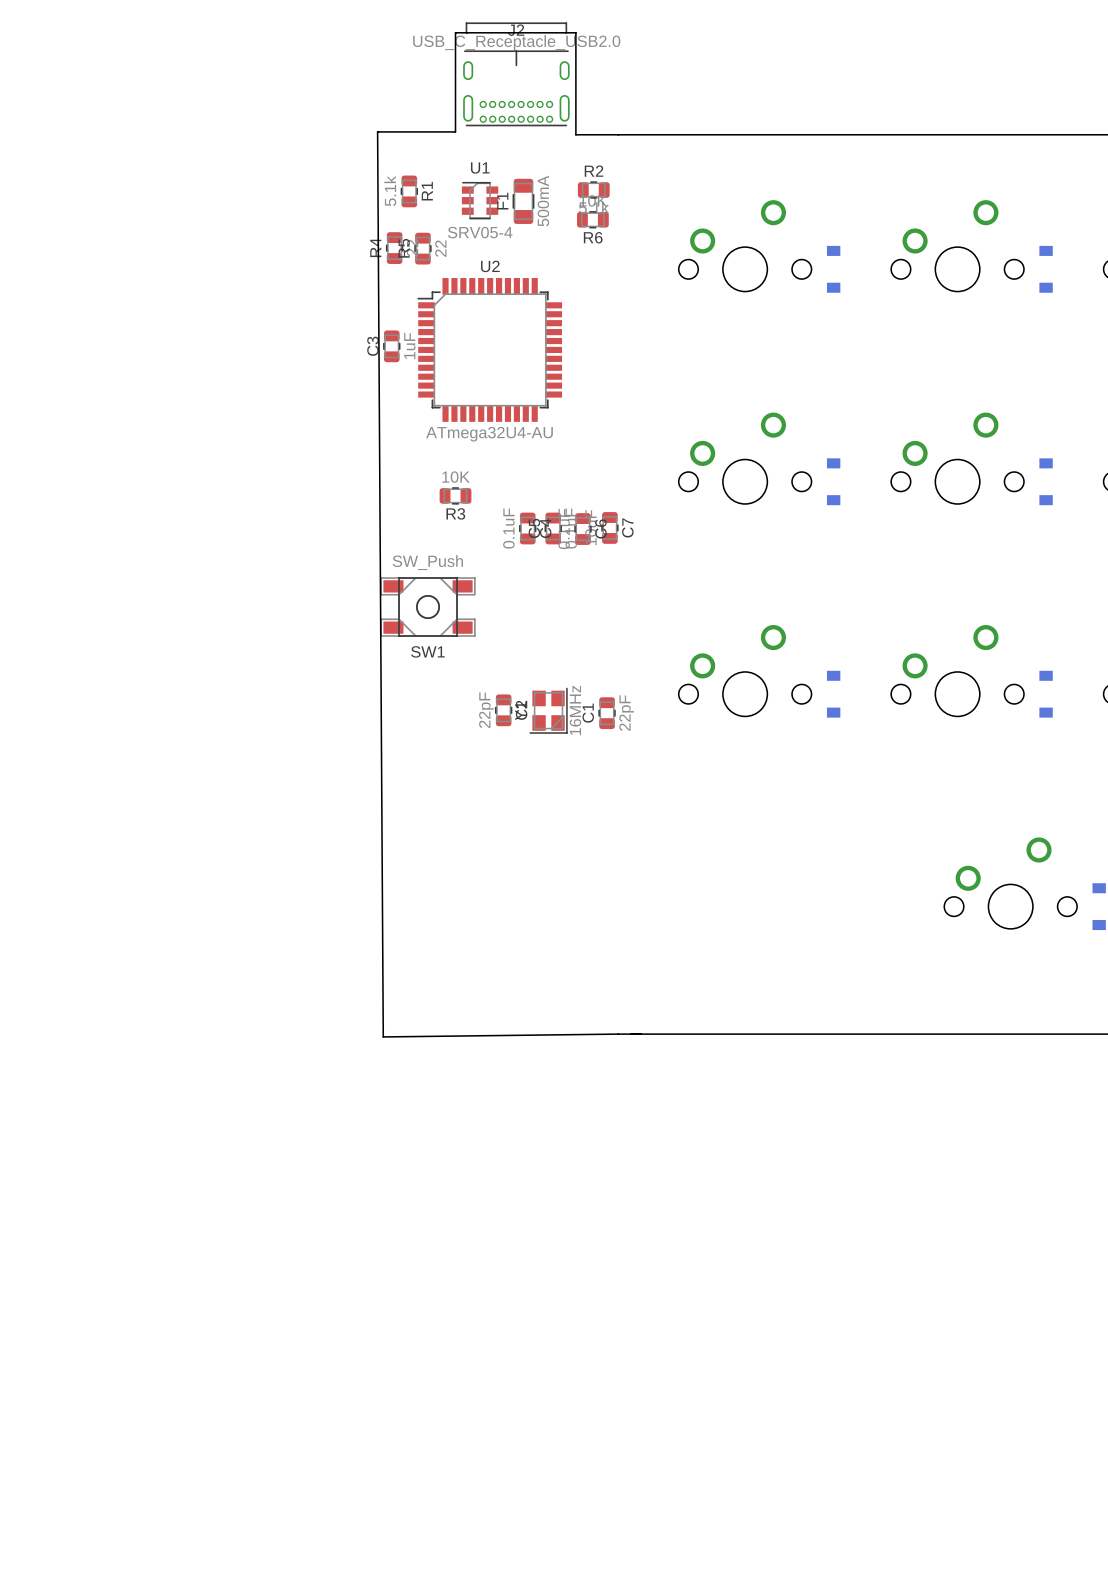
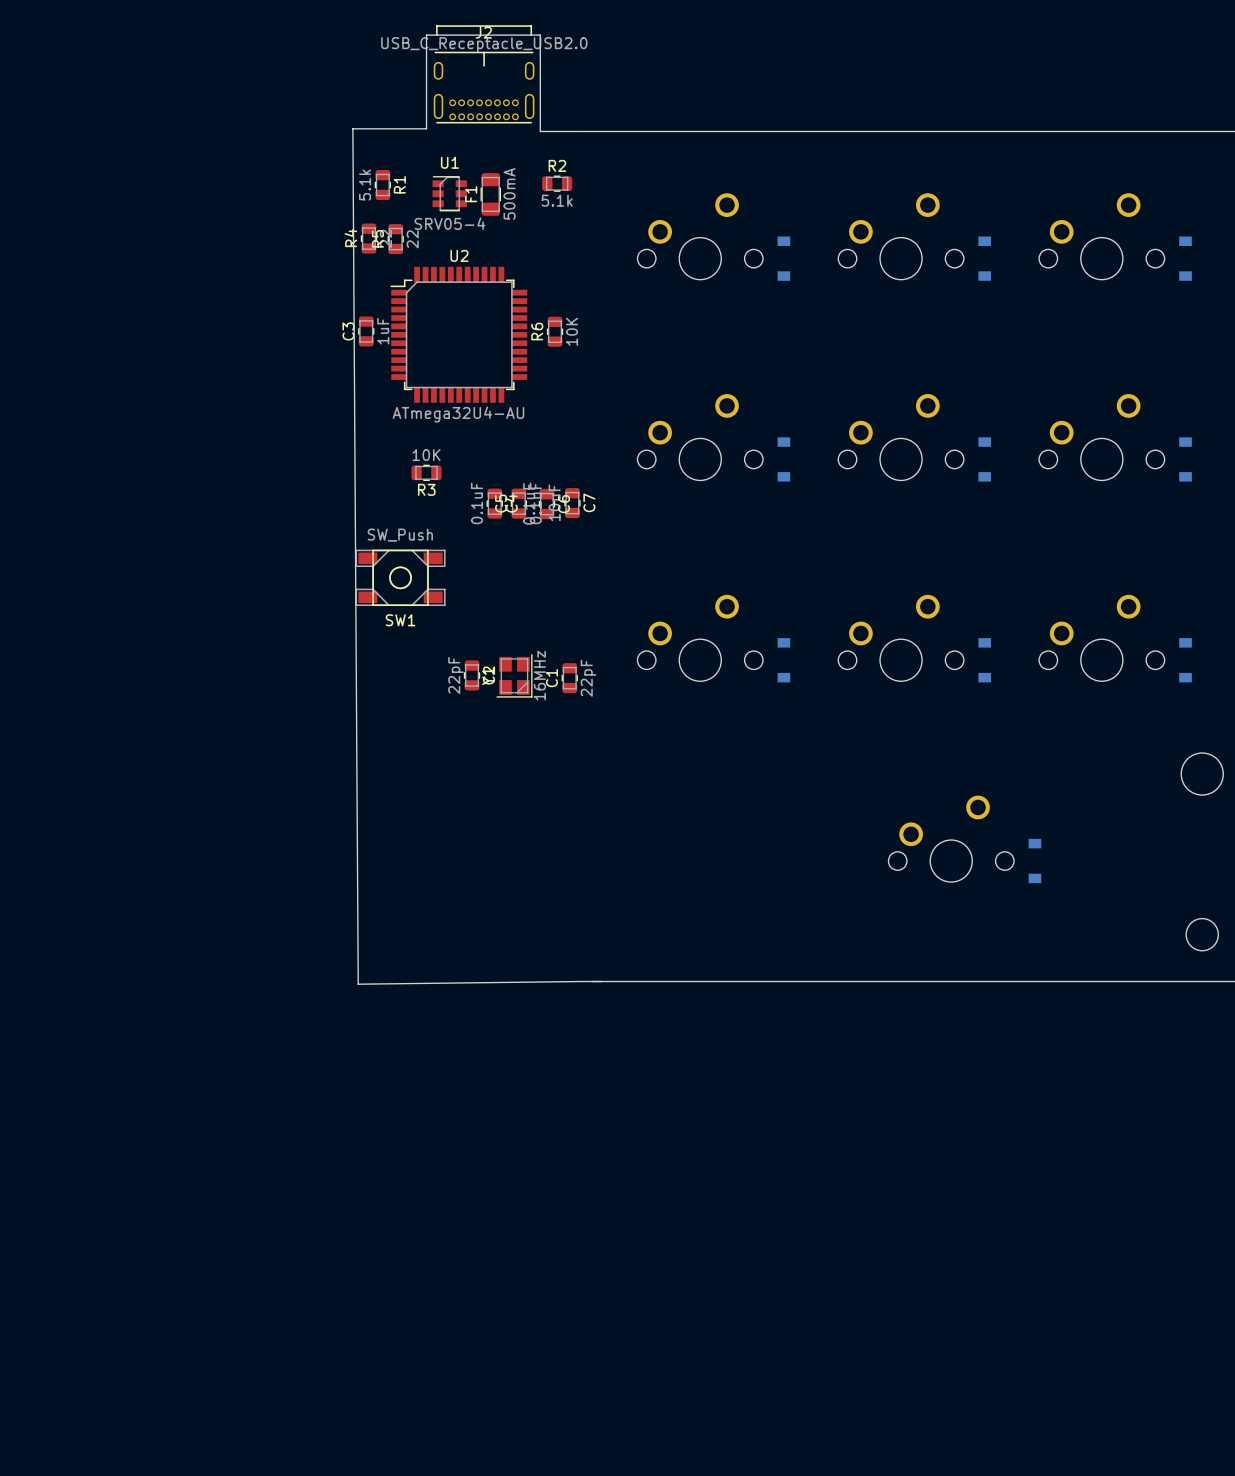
R6 rotation: 0° (592, 219) -> 90° clockwise (555, 331)
R6 position: (592, 219) -> (555, 331)

